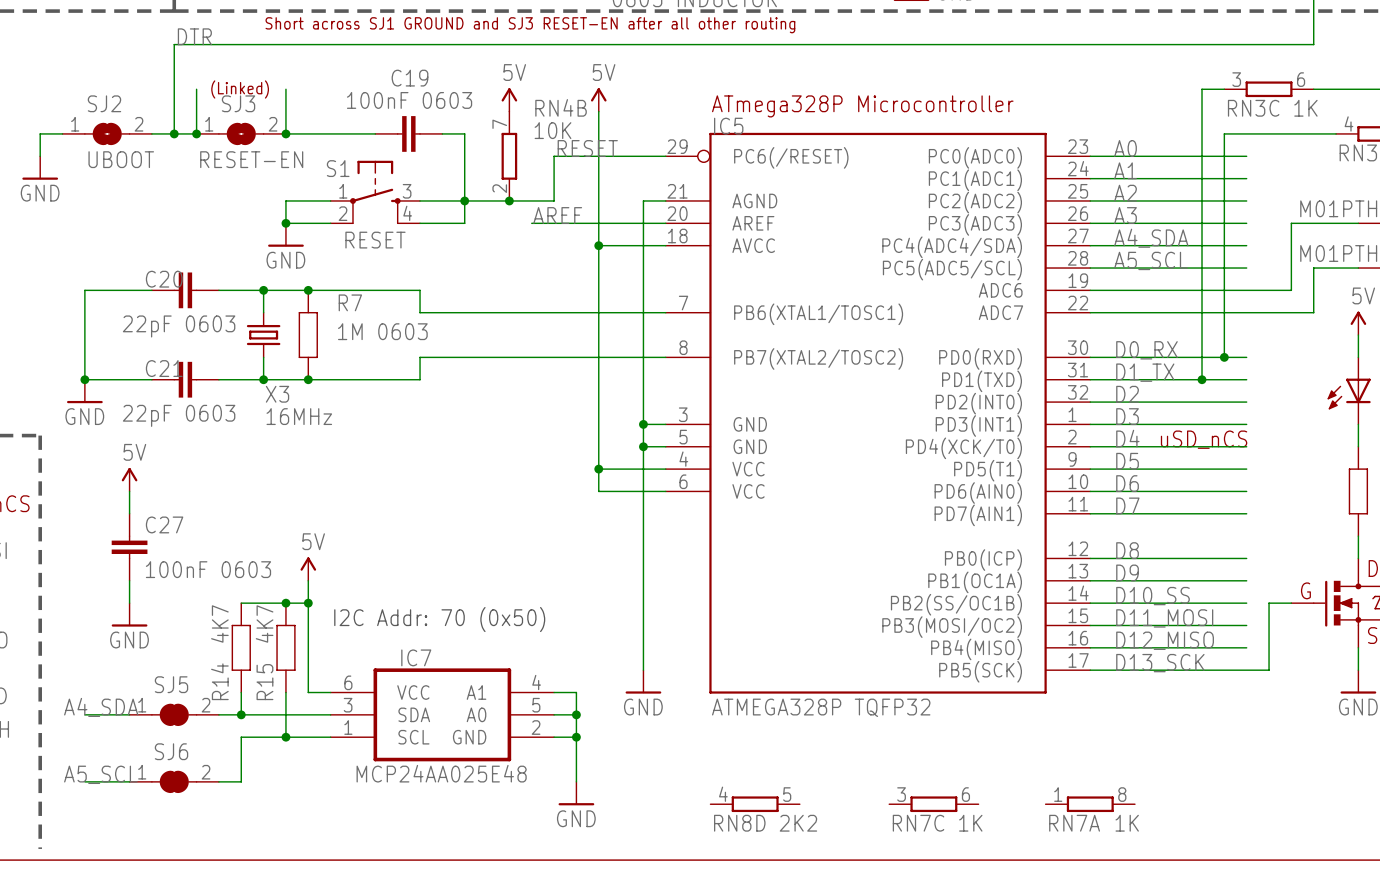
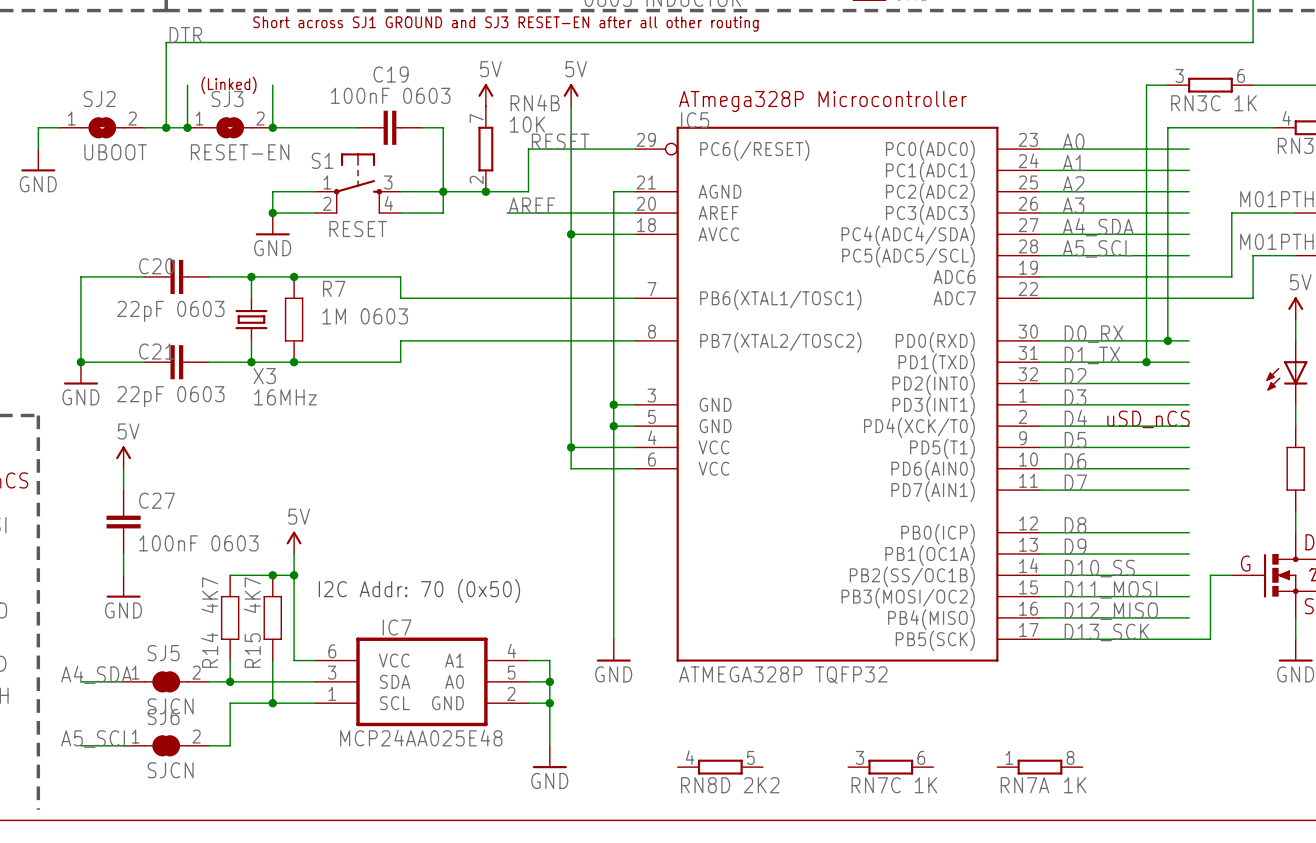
SJ5 value: none -> SJCN (170, 706)
SJ6 value: none -> SJCN (170, 770)

